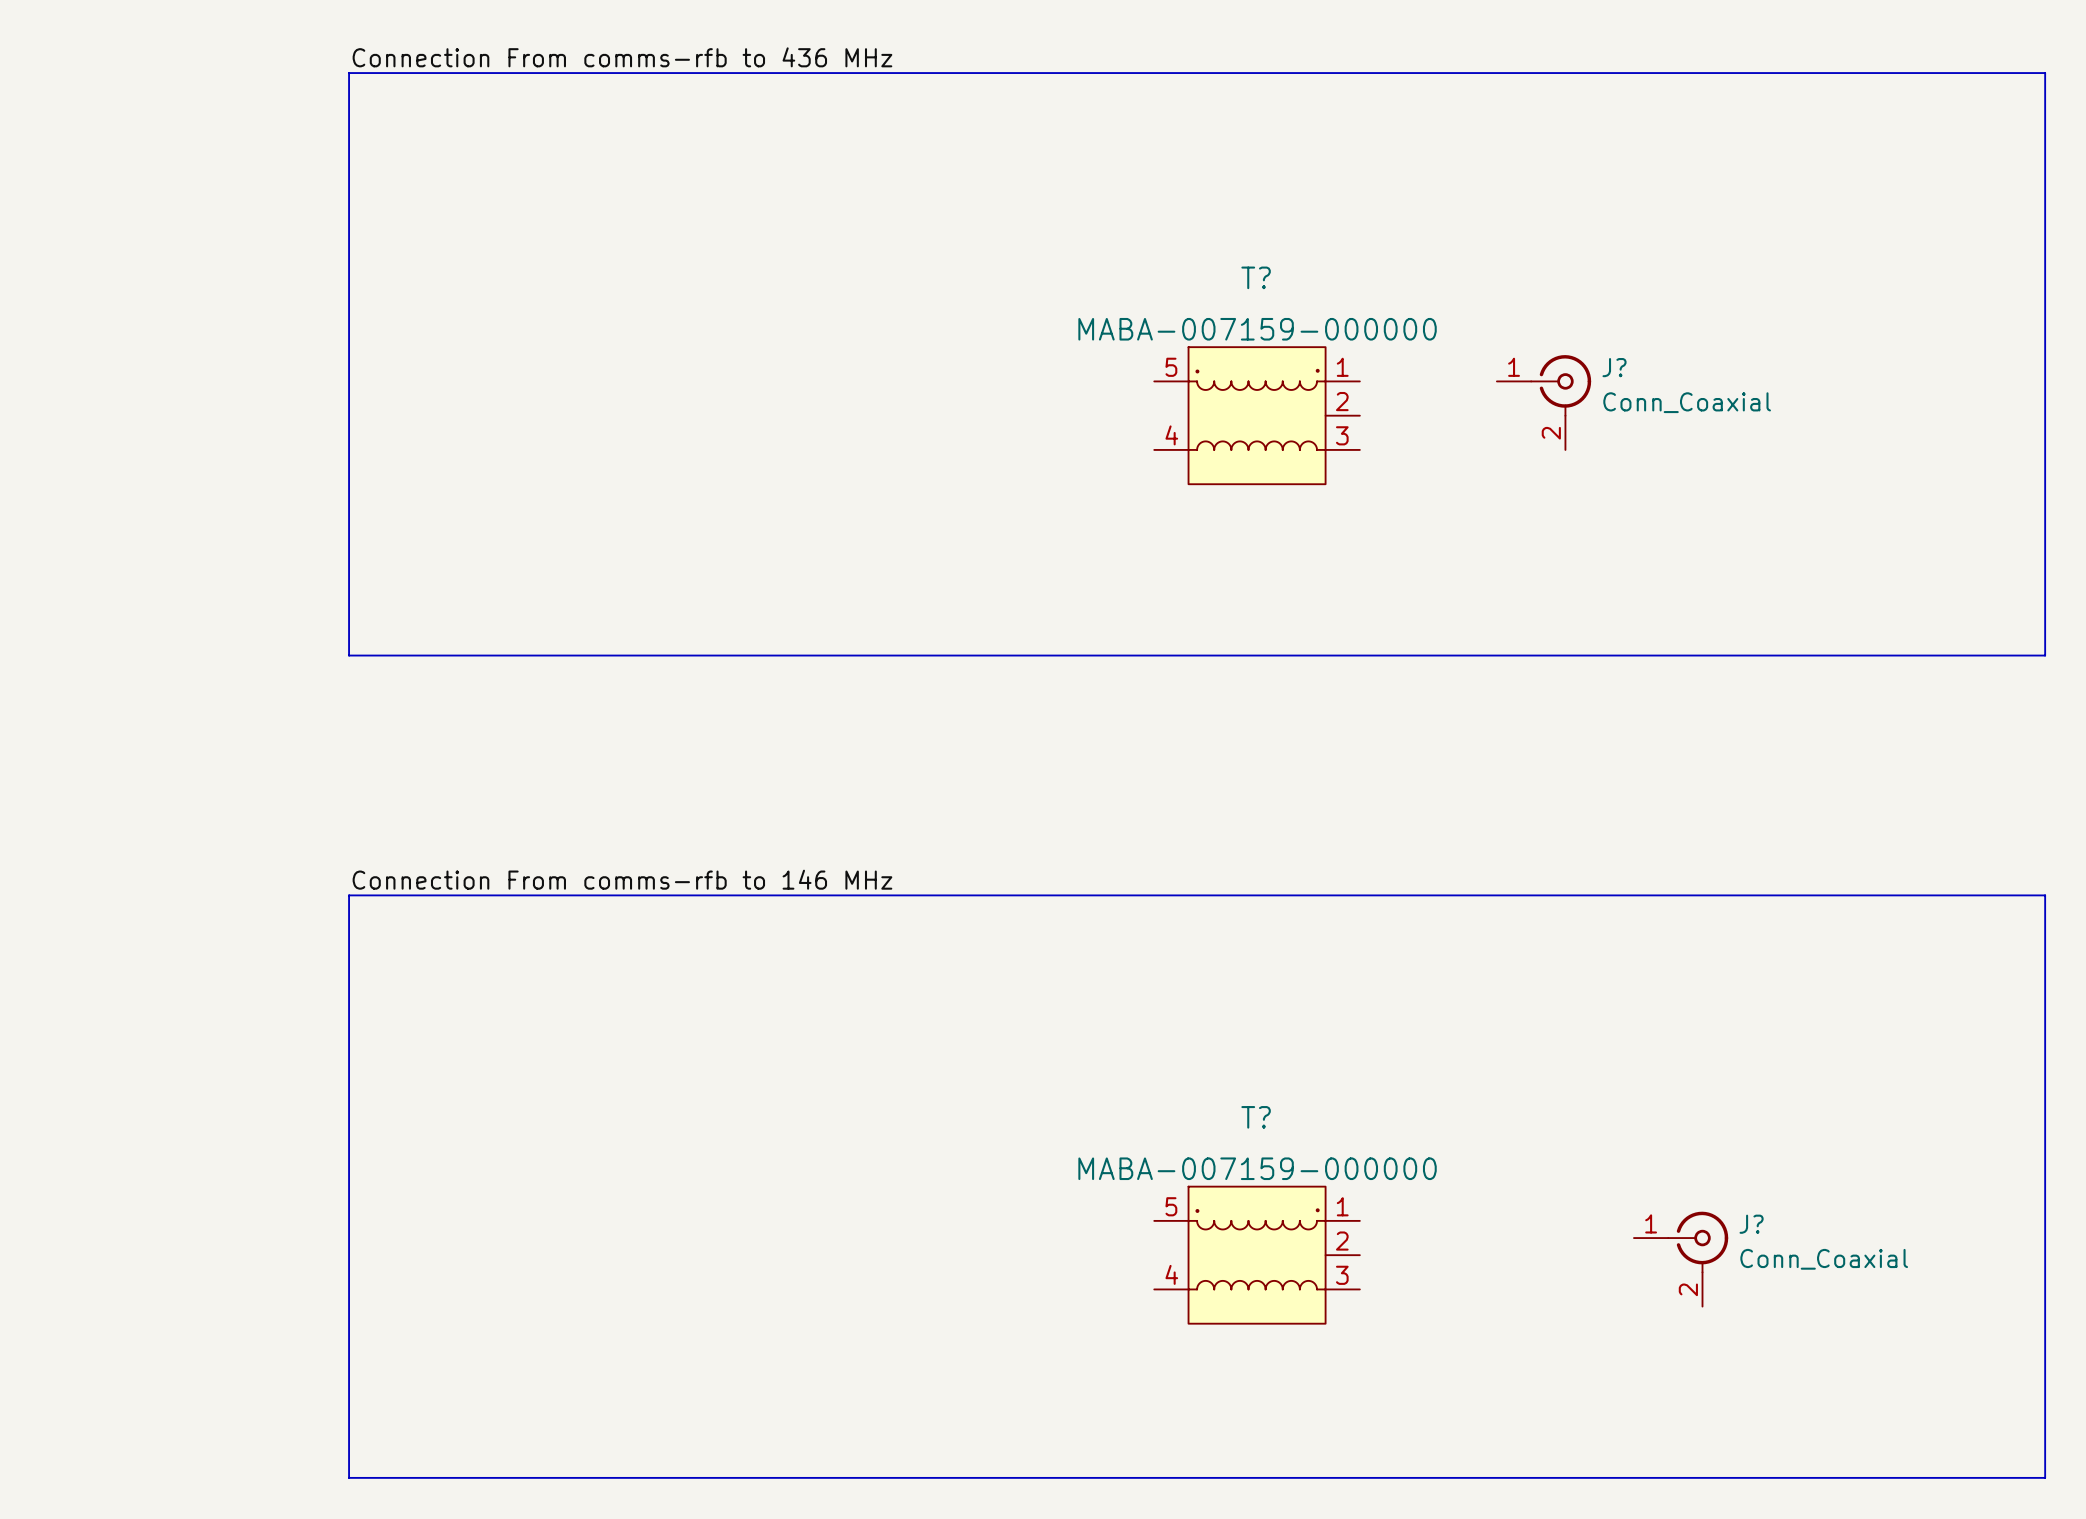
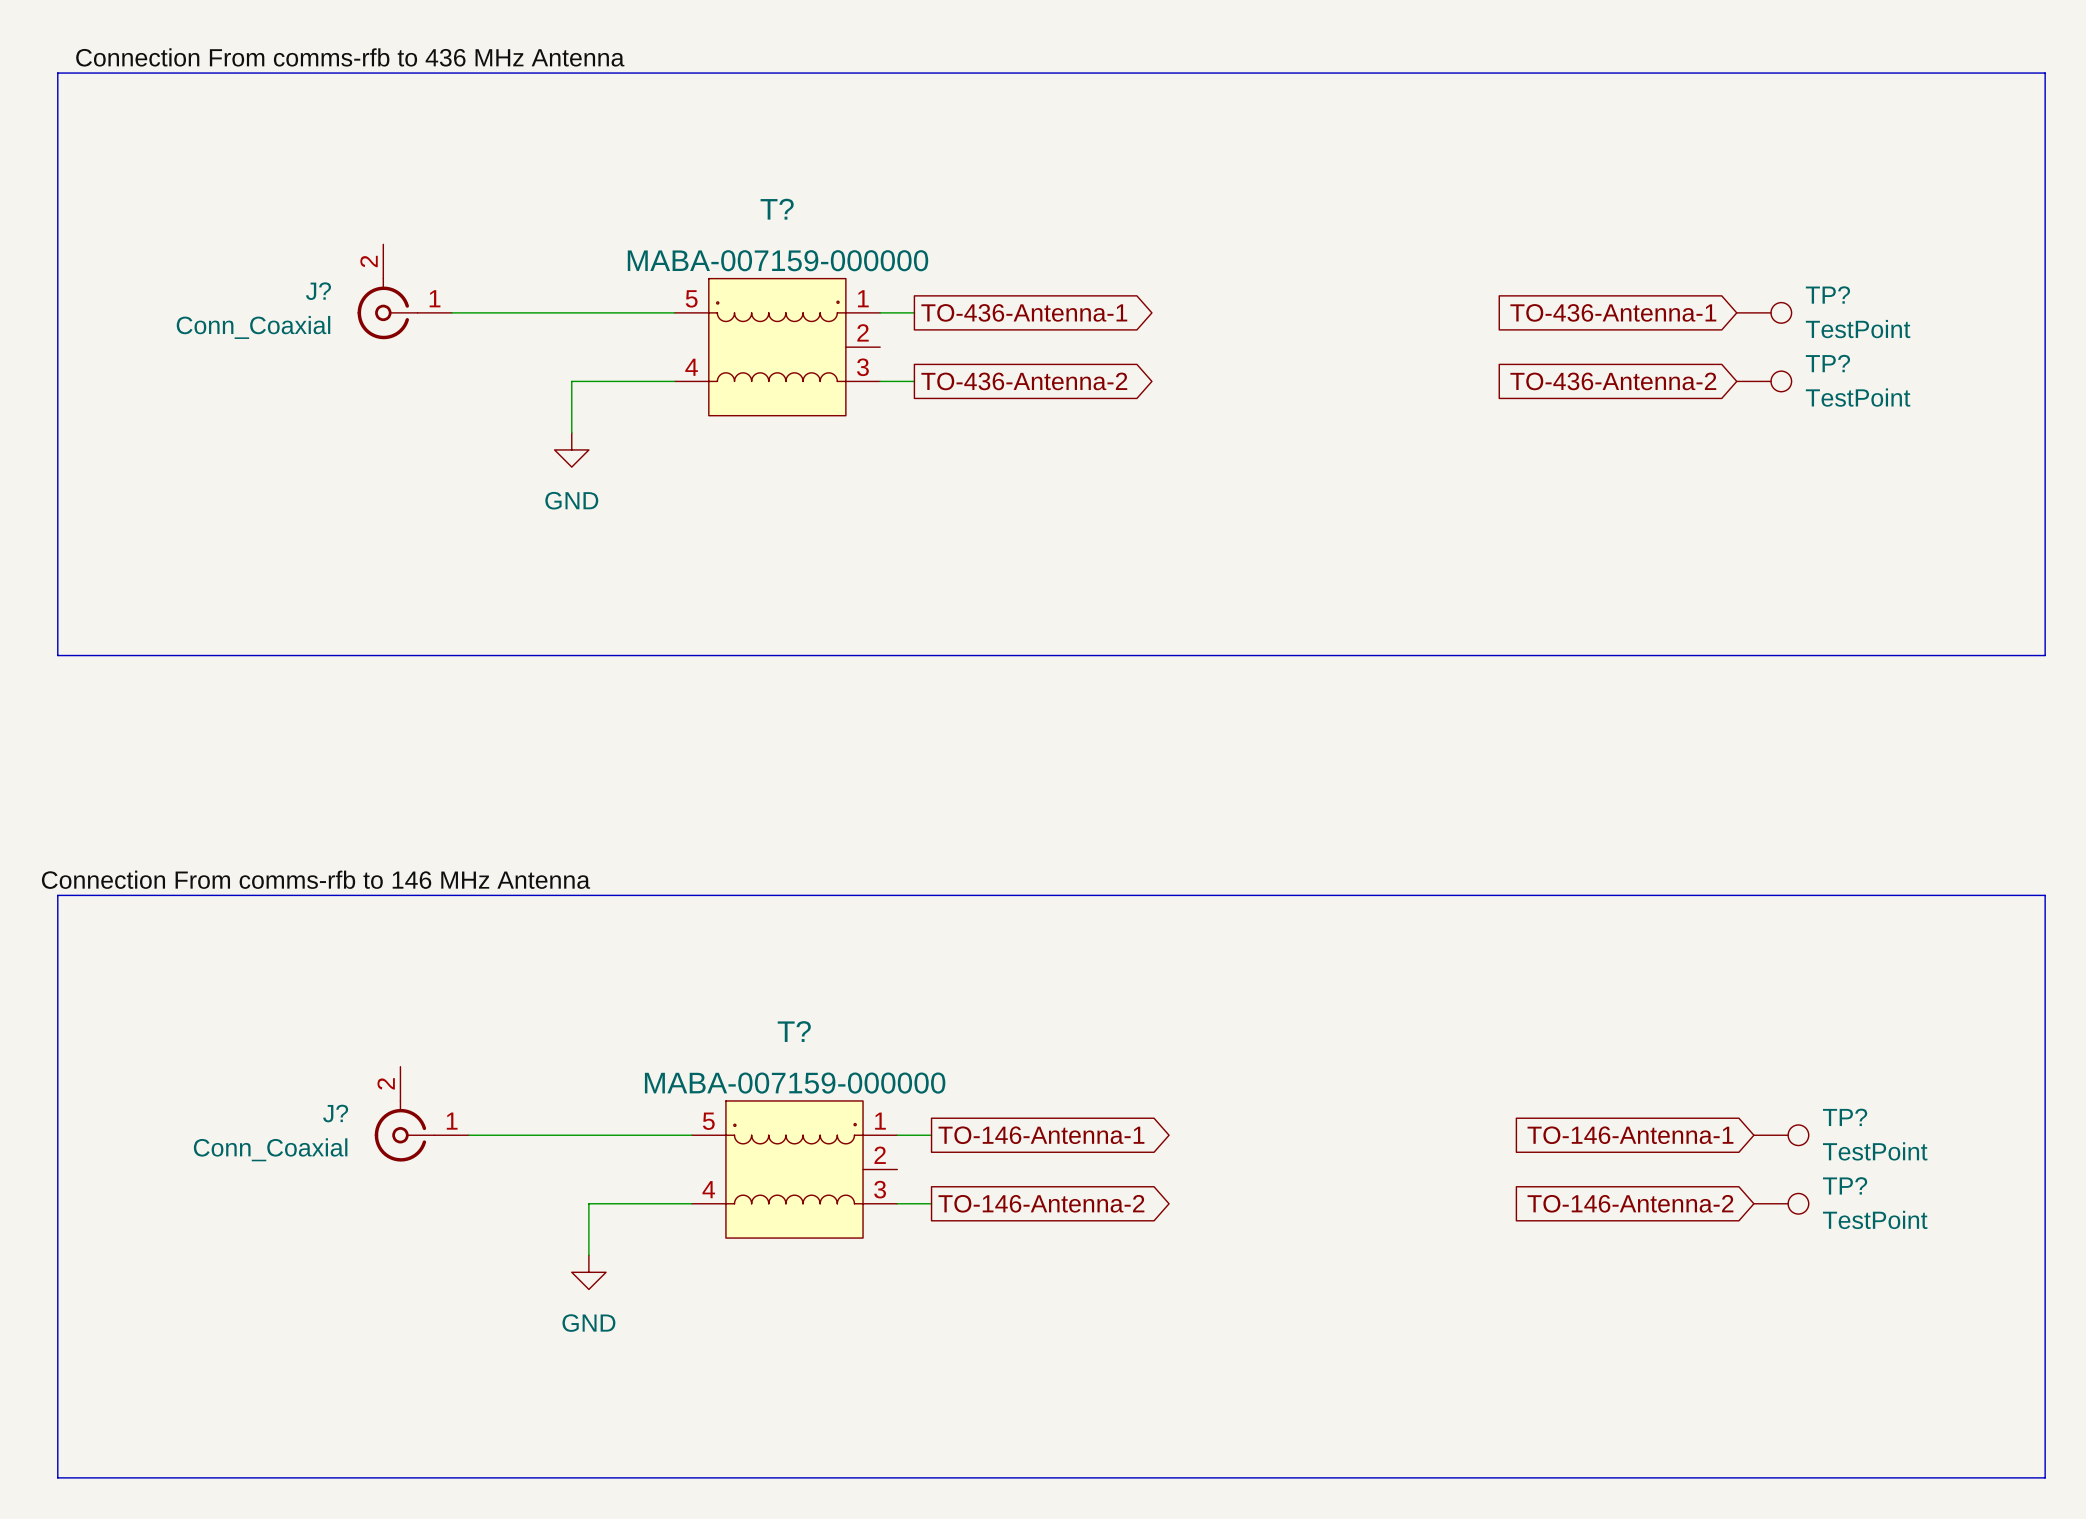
label: Connection From comms-rfb to 436 MHz (622, 57) -> Connection From comms-rfb to 436 MHz Antenna (350, 57)
line: (349, 73) (349, 655) -> (349, 73) (57, 73) (57, 655) (349, 655)
J?: none -> Conn_Coaxial (404, 291)
wire: none -> (451, 312) (674, 312)
wire: none -> (880, 312) (914, 312)
global label: none -> TO-436-Antenna-1 (1024, 312)
global label: none -> TO-436-Antenna-1 (1613, 312)
TP?: none -> TestPoint (1764, 312)
T?: none -> MABA-007159-000000 (777, 347)
wire: none -> (674, 381) (571, 381) (571, 432)
wire: none -> (880, 381) (914, 381)
global label: none -> TO-436-Antenna-2 (1024, 381)
global label: none -> TO-436-Antenna-2 (1613, 381)
TP?: none -> TestPoint (1764, 381)
J?: Conn_Coaxial (1544, 402) -> none
T?: MABA-007159-000000 (1257, 415) -> none
power symbol: none -> GND (571, 449)
label: Connection From comms-rfb to 146 MHz (622, 879) -> Connection From comms-rfb to 146 MHz Antenna (316, 879)
line: (349, 895) (349, 1477) -> (349, 895) (57, 895) (57, 1477) (349, 1477)
J?: none -> Conn_Coaxial (421, 1114)
global label: none -> TO-146-Antenna-1 (1041, 1135)
global label: none -> TO-146-Antenna-1 (1630, 1135)
wire: none -> (468, 1135) (691, 1135)
wire: none -> (897, 1135) (931, 1135)
TP?: none -> TestPoint (1781, 1135)
T?: none -> MABA-007159-000000 (794, 1169)
wire: none -> (691, 1203) (588, 1203) (588, 1255)
wire: none -> (897, 1203) (931, 1203)
global label: none -> TO-146-Antenna-2 (1041, 1203)
global label: none -> TO-146-Antenna-2 (1630, 1203)
TP?: none -> TestPoint (1781, 1203)
T?: MABA-007159-000000 (1257, 1255) -> none
J?: Conn_Coaxial (1681, 1259) -> none
power symbol: none -> GND (588, 1272)

